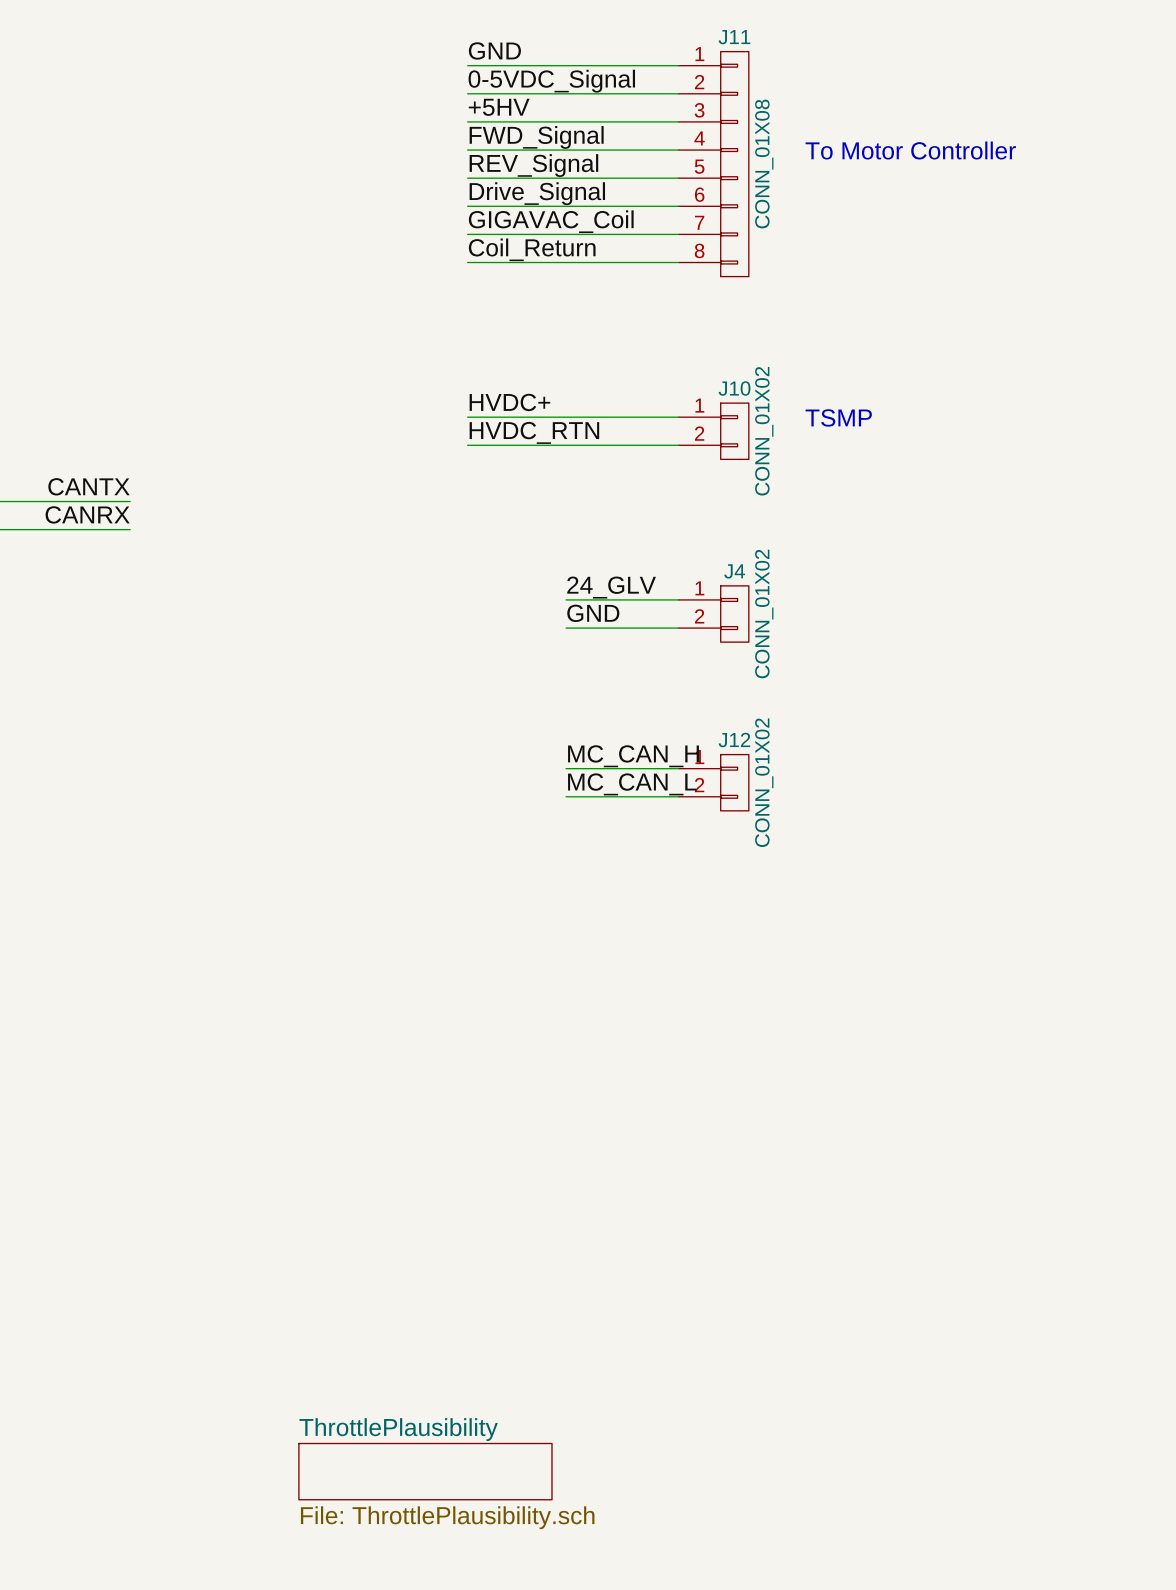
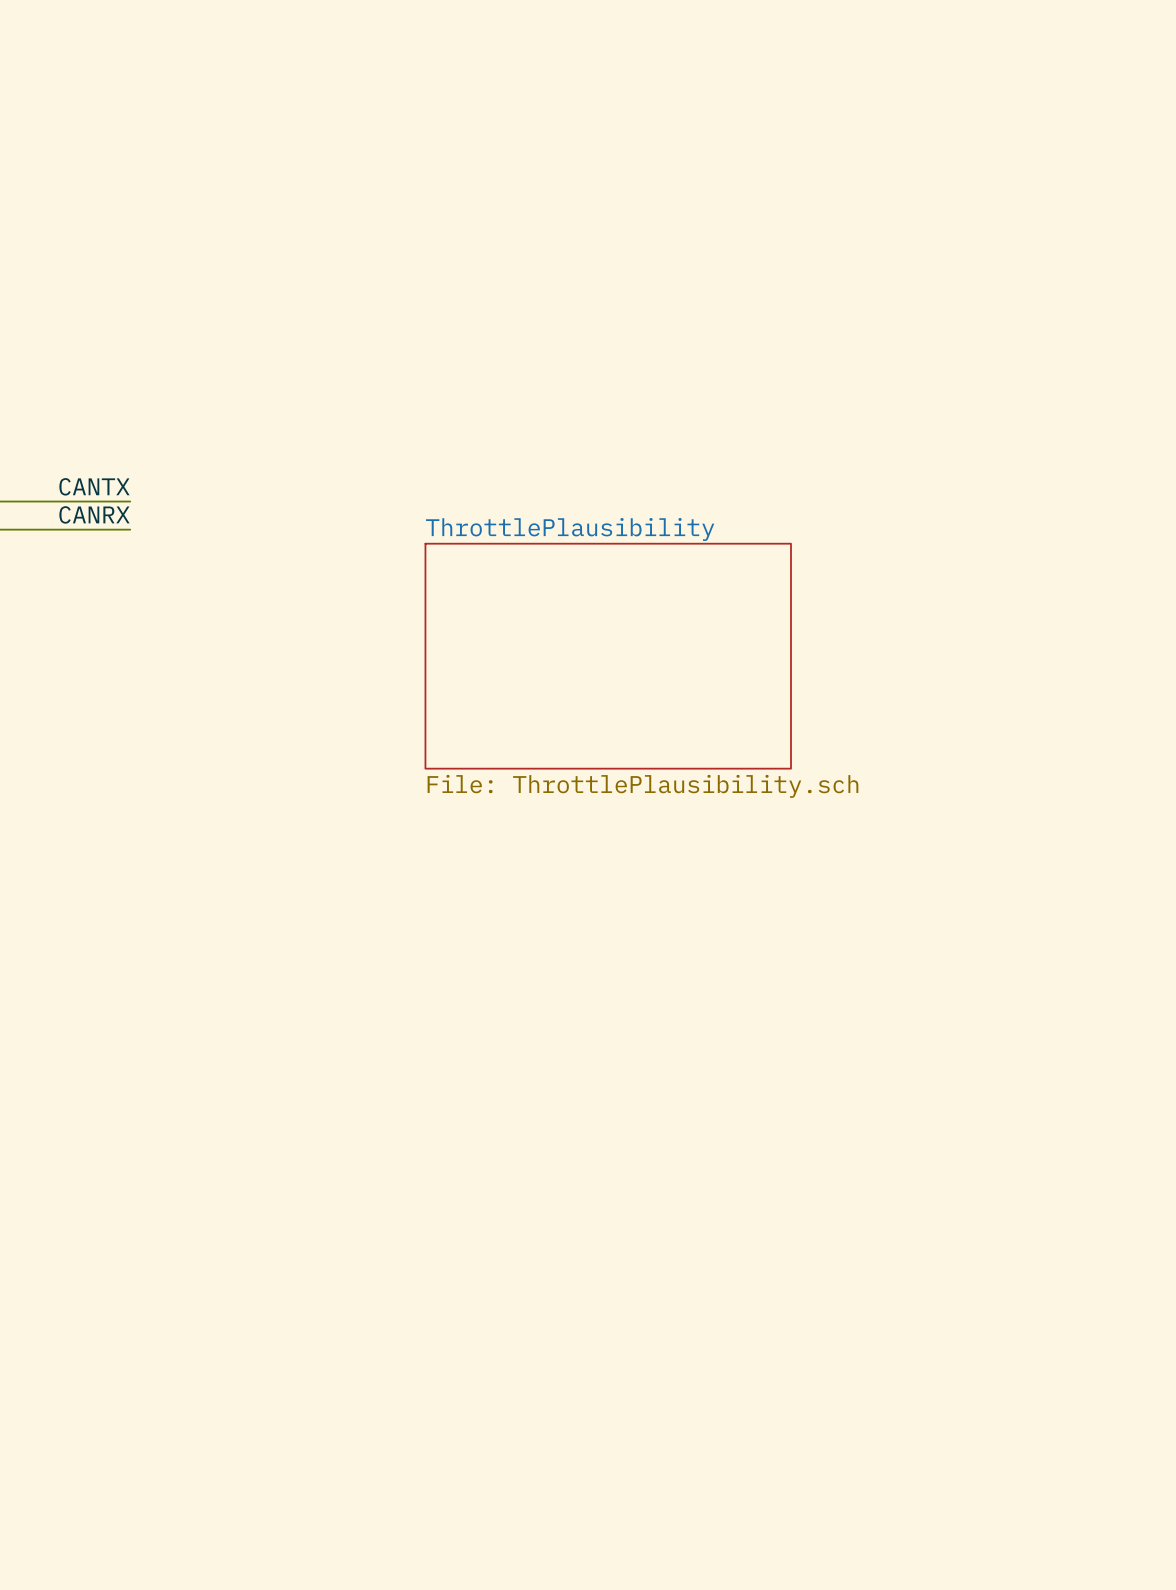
label: GND (494, 50) -> none
wire: (467, 65) (678, 65) -> none
label: 0-5VDC_Signal (551, 81) -> none
wire: (467, 93) (678, 93) -> none
label: +5HV (499, 107) -> none
wire: (467, 121) (678, 121) -> none
label: FWD_Signal (536, 137) -> none
wire: (467, 150) (678, 150) -> none
text: To Motor Controller (910, 150) -> none
J11: CONN_01X08 (713, 164) -> none
label: REV_Signal (533, 165) -> none
wire: (467, 178) (678, 178) -> none
label: Drive_Signal (537, 193) -> none
wire: (467, 206) (678, 206) -> none
label: GIGAVAC_Coil (551, 221) -> none
wire: (467, 234) (678, 234) -> none
label: Coil_Return (532, 249) -> none
wire: (467, 262) (678, 262) -> none
label: HVDC+ (509, 402) -> none
wire: (467, 417) (678, 417) -> none
text: TSMP (838, 417) -> none
J10: CONN_01X02 (713, 431) -> none
label: HVDC_RTN (534, 432) -> none
wire: (467, 445) (678, 445) -> none
label: 24_GLV (611, 587) -> none
wire: (566, 599) (678, 599) -> none
label: GND (593, 613) -> none
J4: CONN_01X02 (713, 614) -> none
wire: (566, 628) (678, 628) -> none
sheet ThrottlePlausibility: none -> File: ThrottlePlausibility.sch (608, 656)
label: MC_CAN_H (633, 756) -> none
J12: CONN_01X02 (713, 782) -> none
label: MC_CAN_L (632, 784) -> none
wire: (566, 796) (678, 796) -> none
sheet ThrottlePlausibility: File: ThrottlePlausibility.sch (425, 1471) -> none

